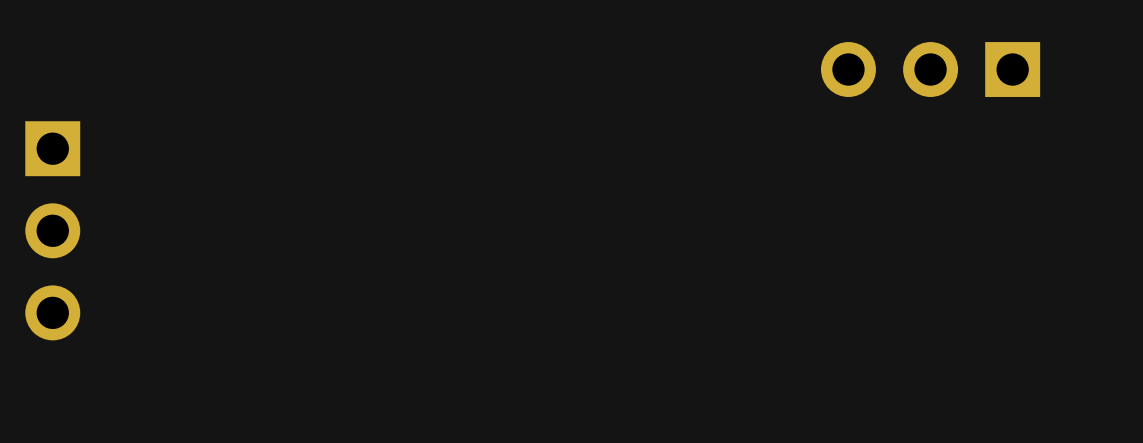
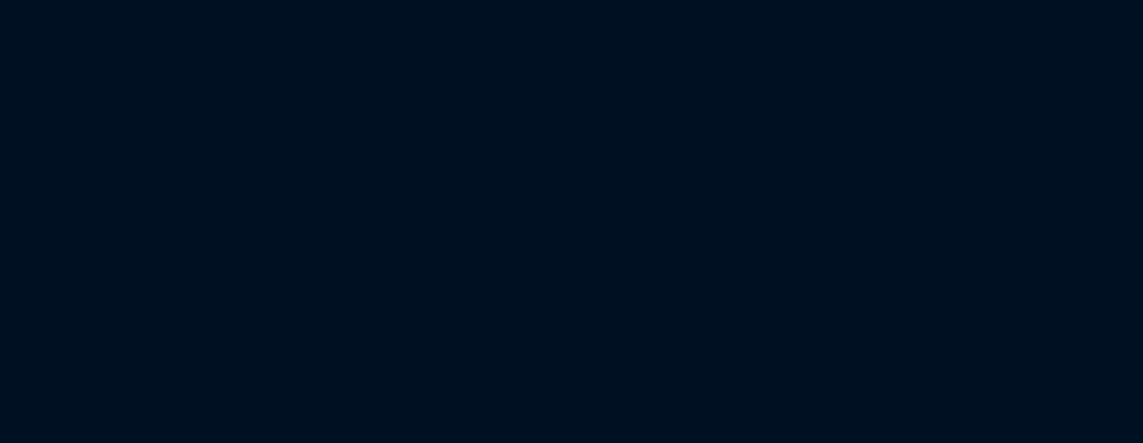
part: (930, 69) -> none
part: (52, 230) -> none

